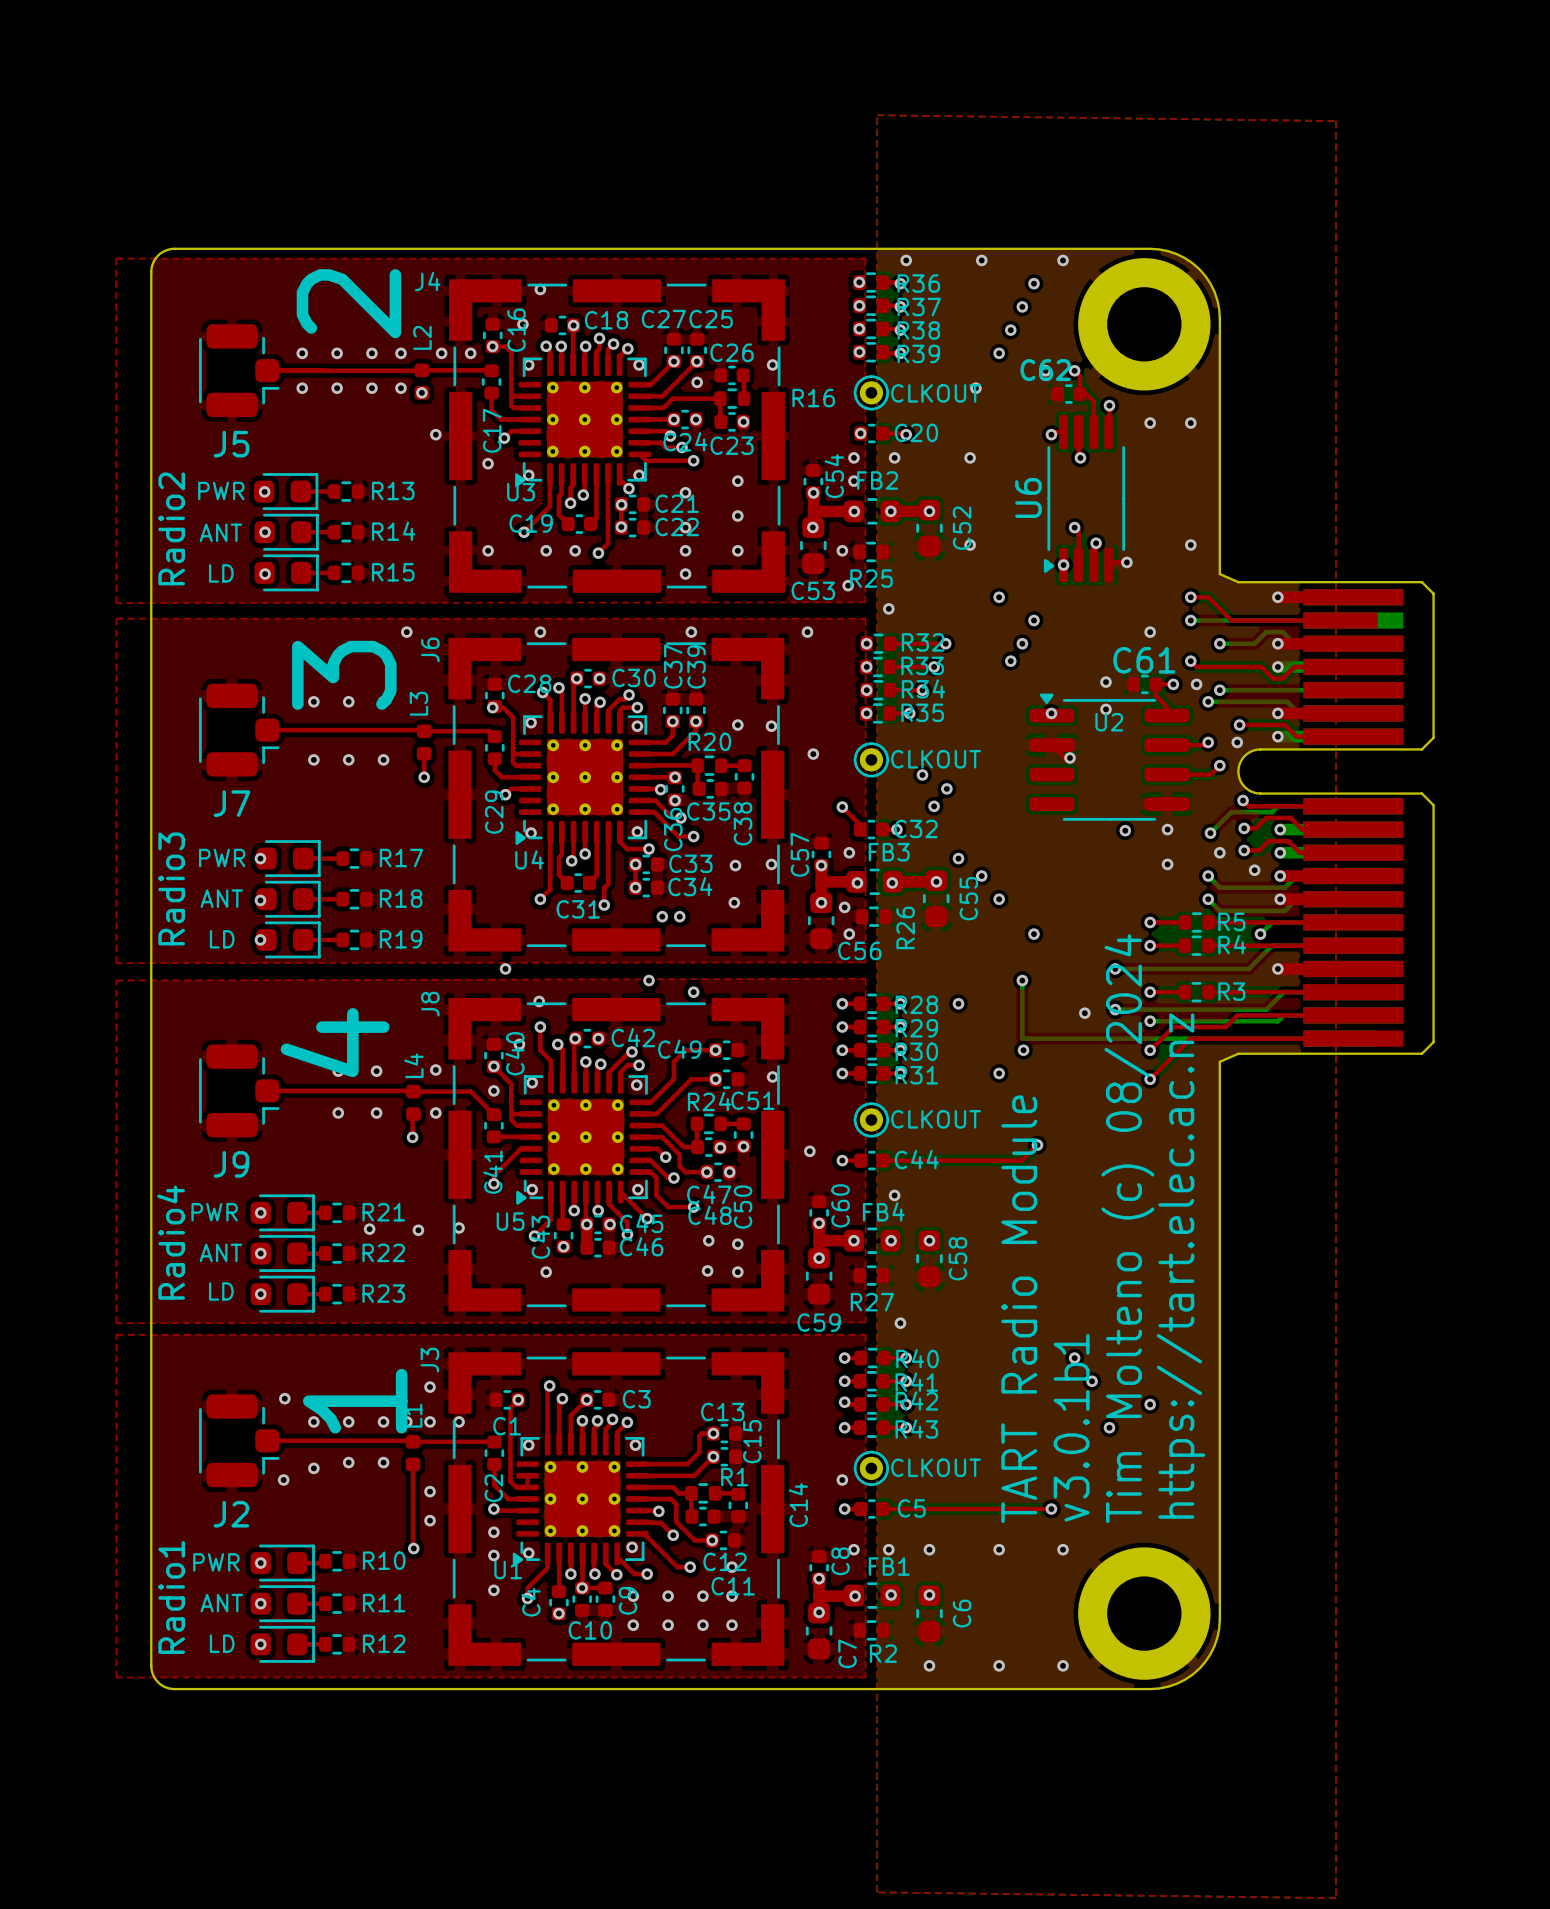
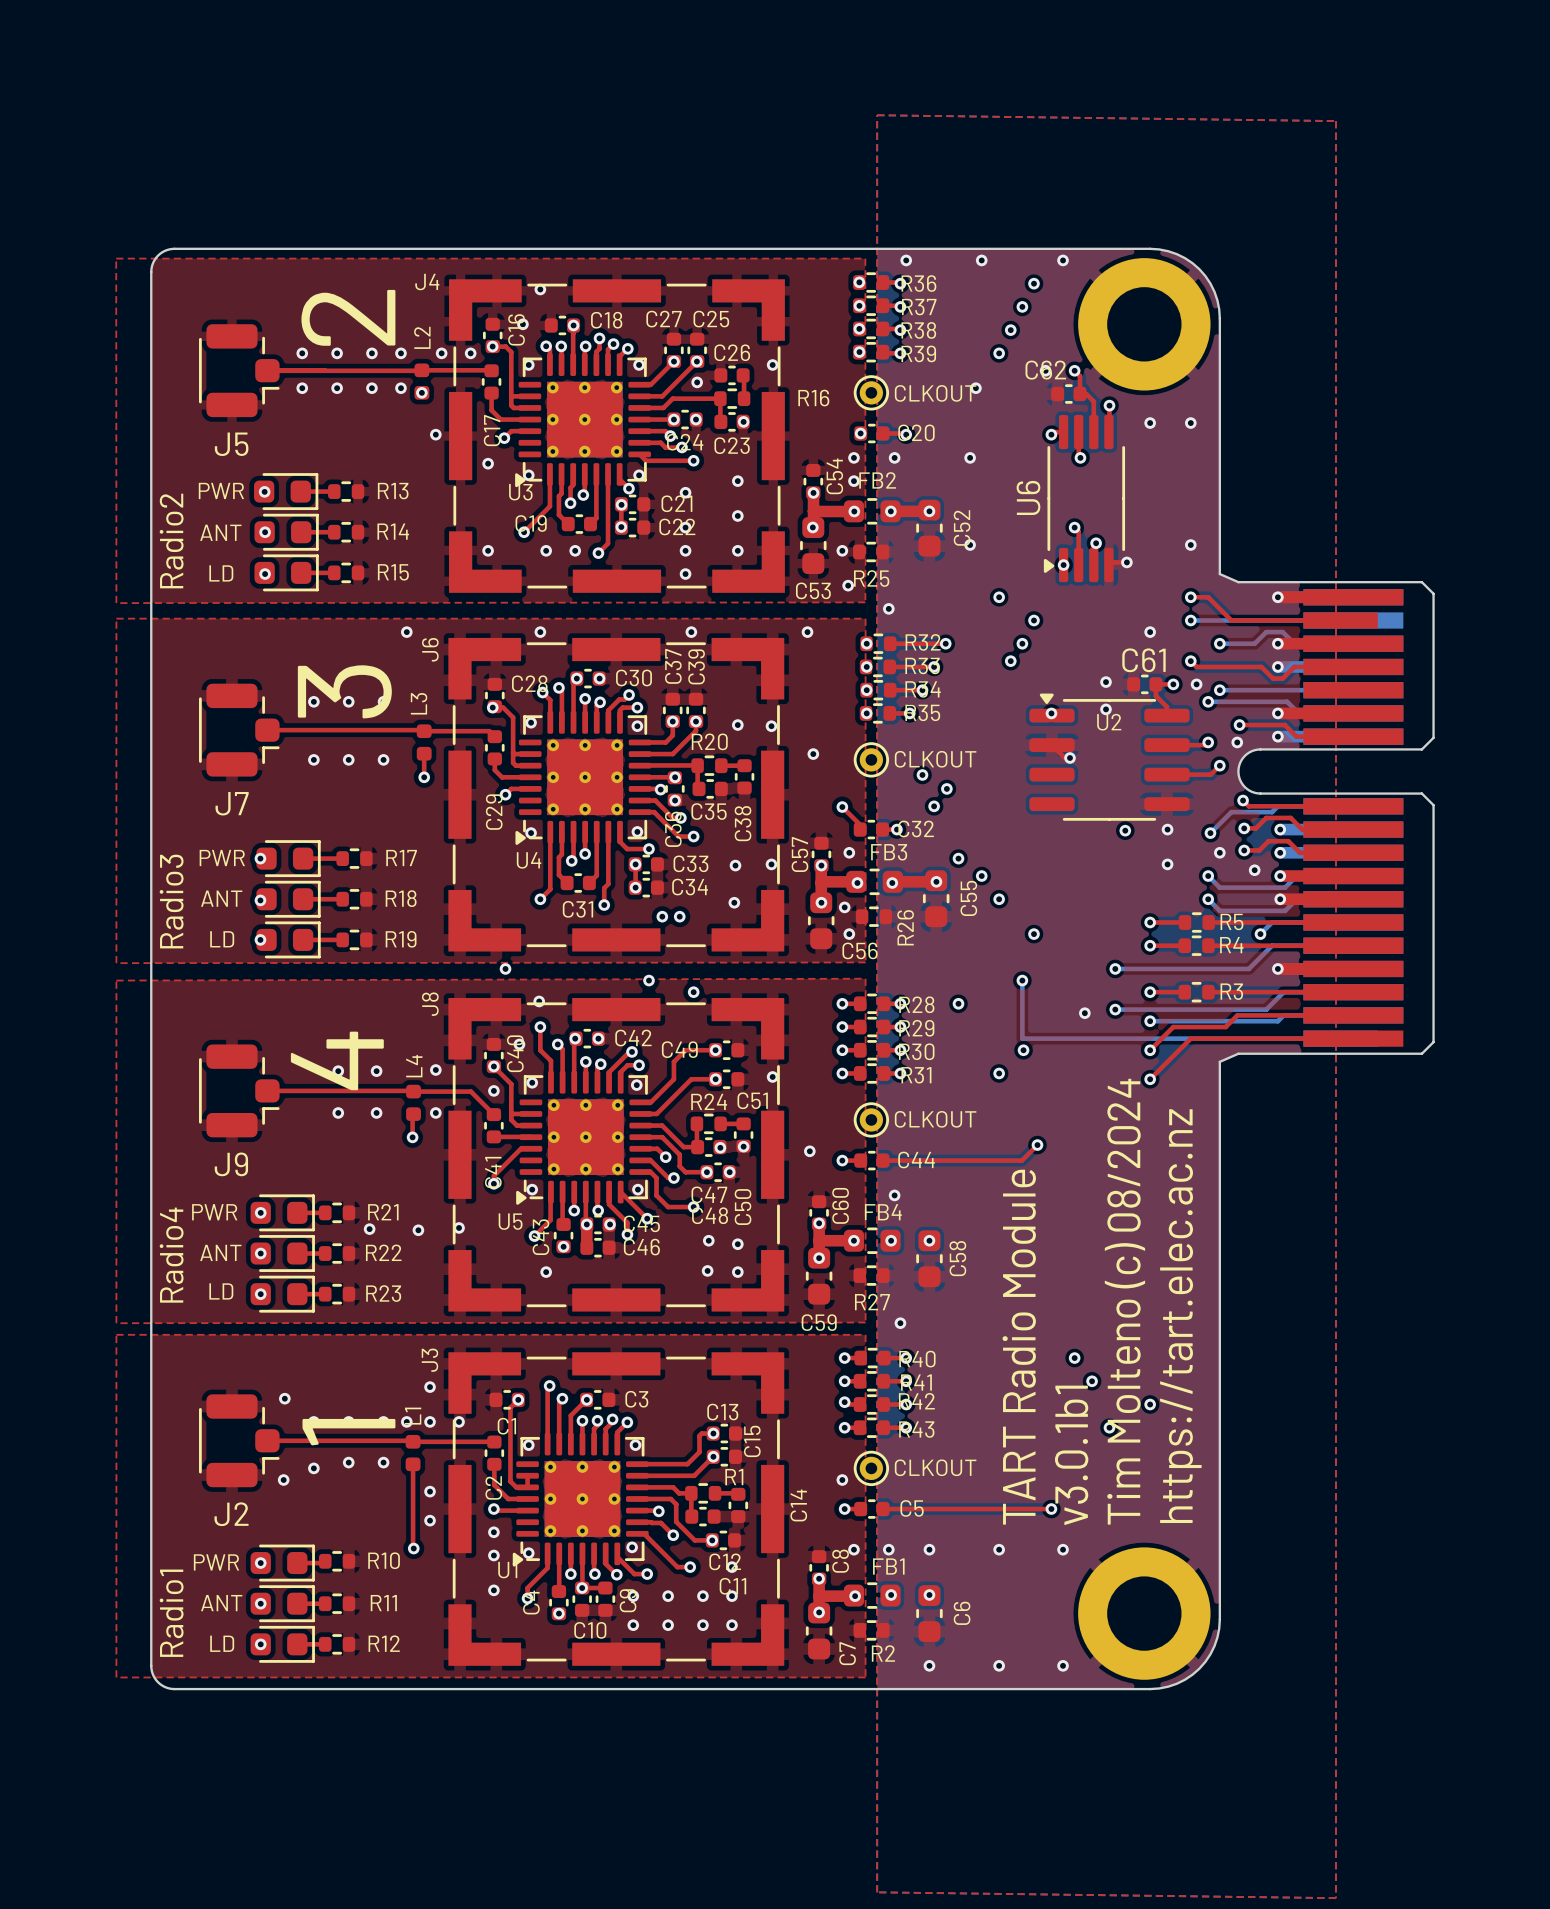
text position: 1 (355, 1401) -> 1 (348, 1432)

